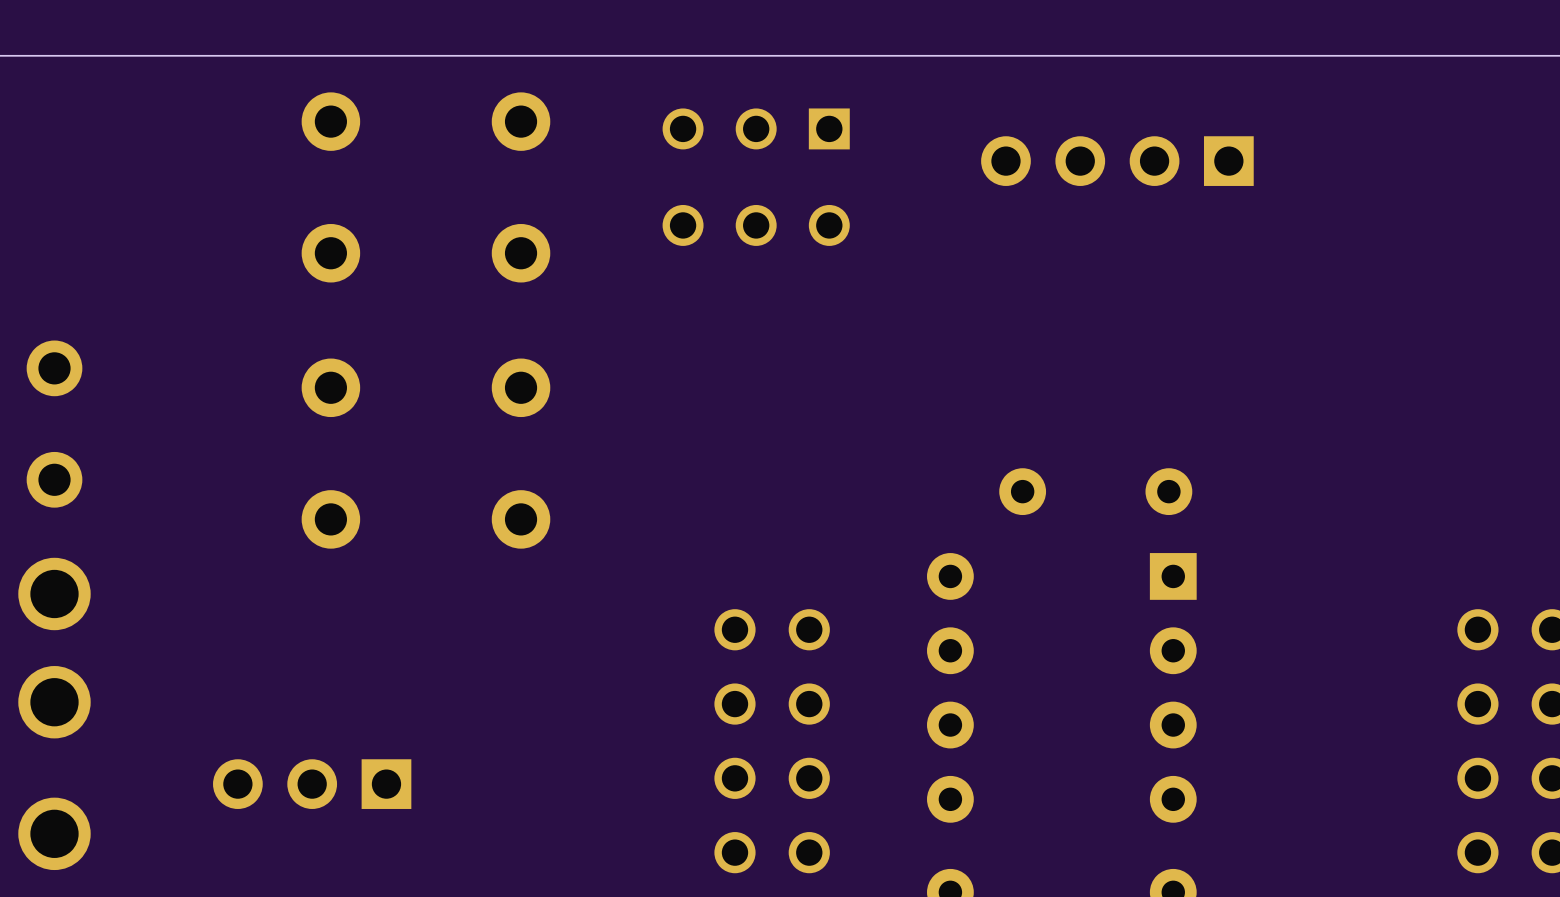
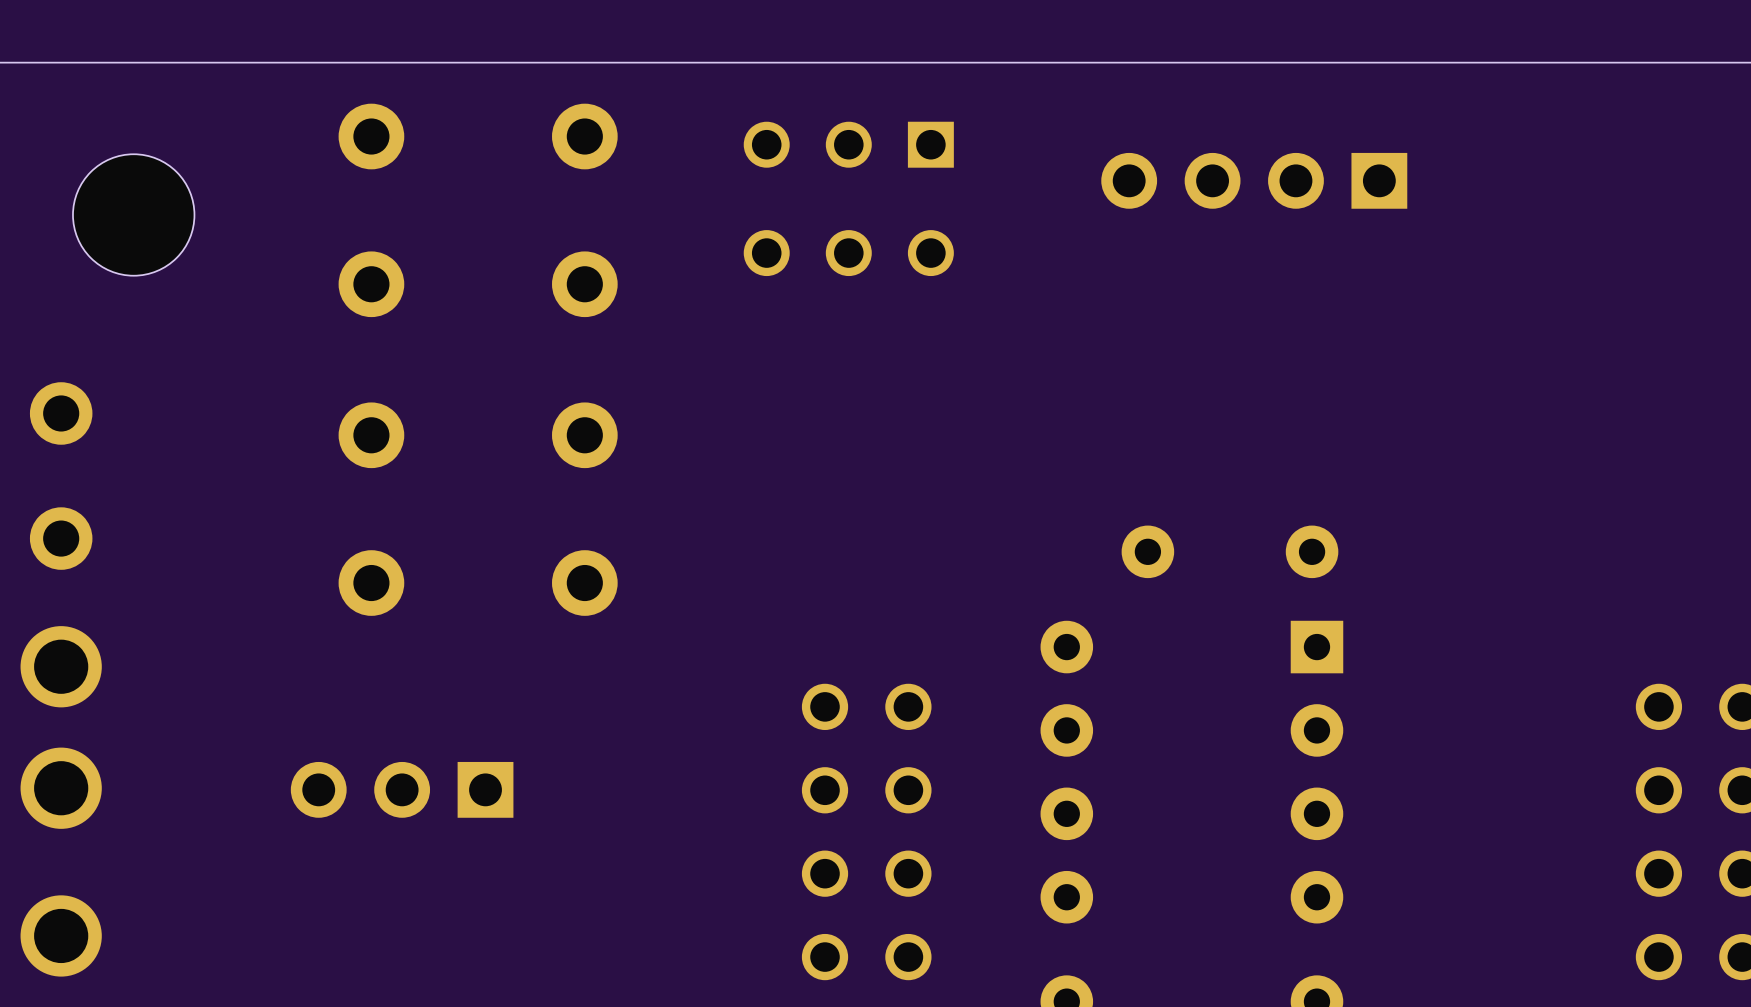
part: none -> (133, 214)
part position: (312, 784) -> (402, 789)

